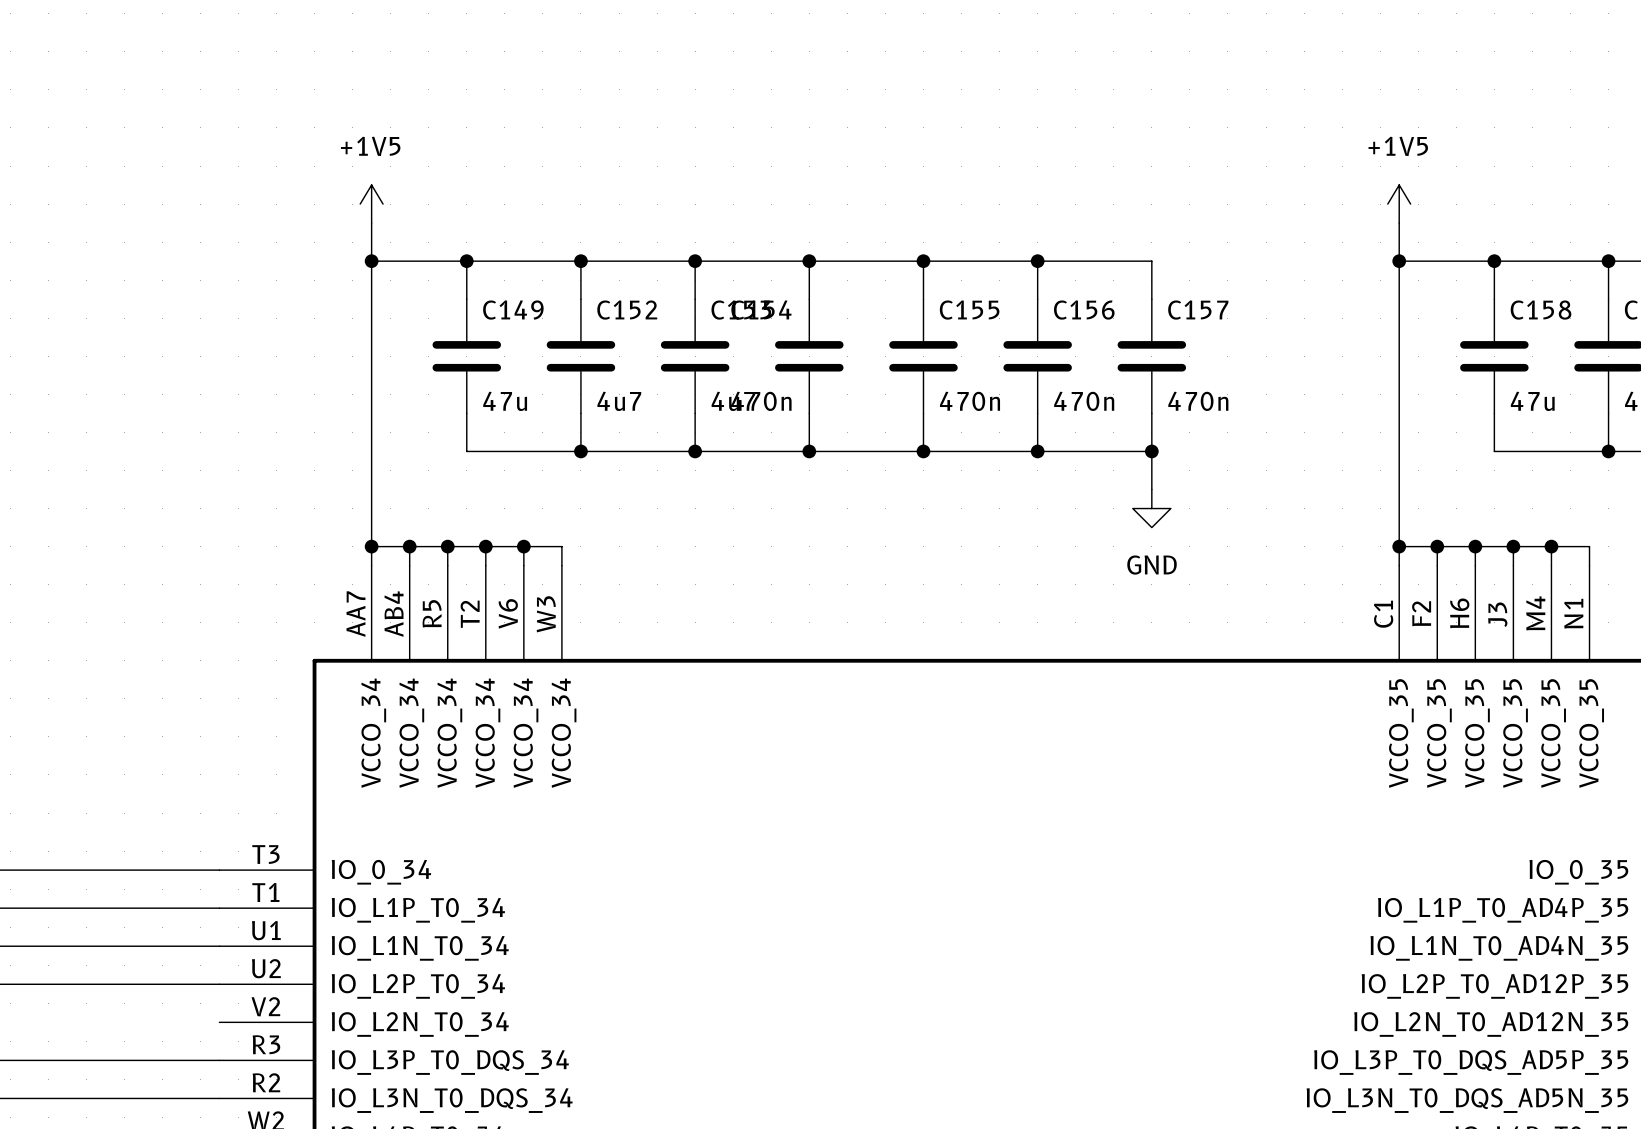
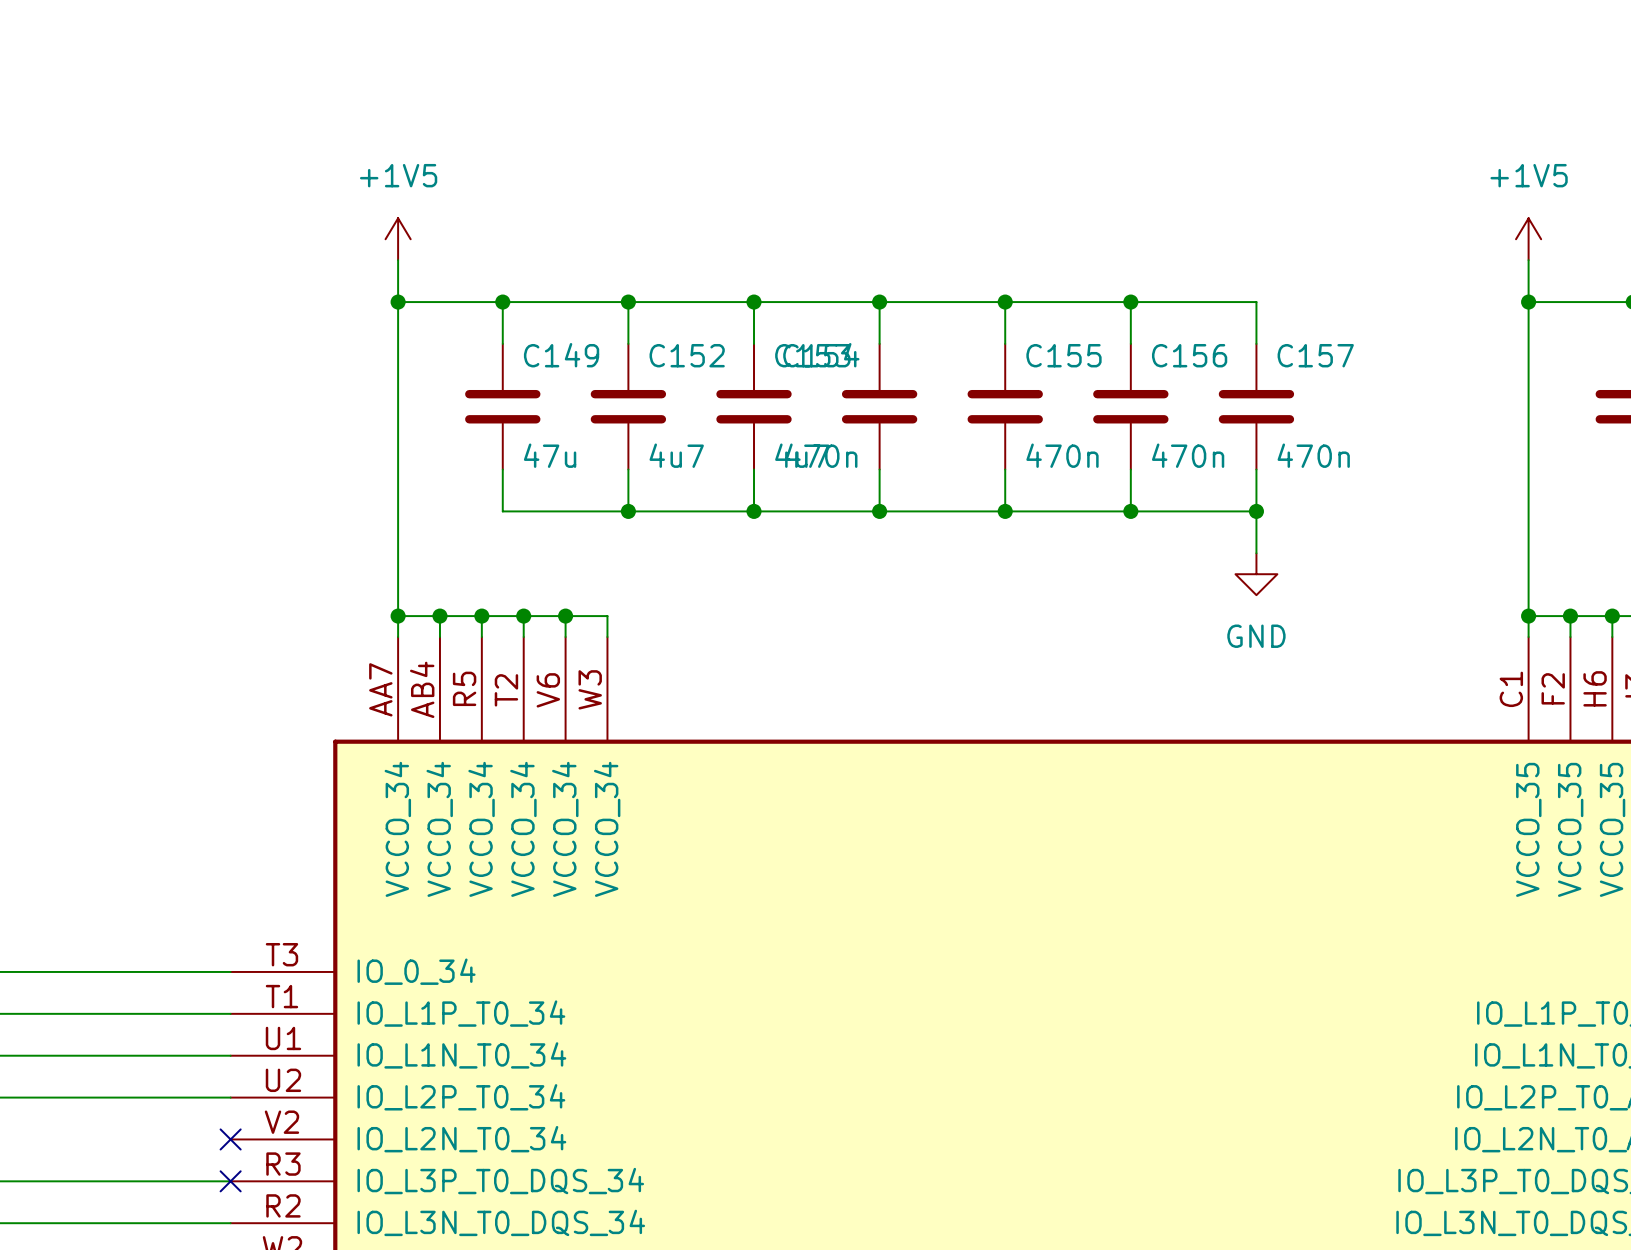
no-connect mark: none -> (230, 1139)
no-connect mark: none -> (230, 1181)

